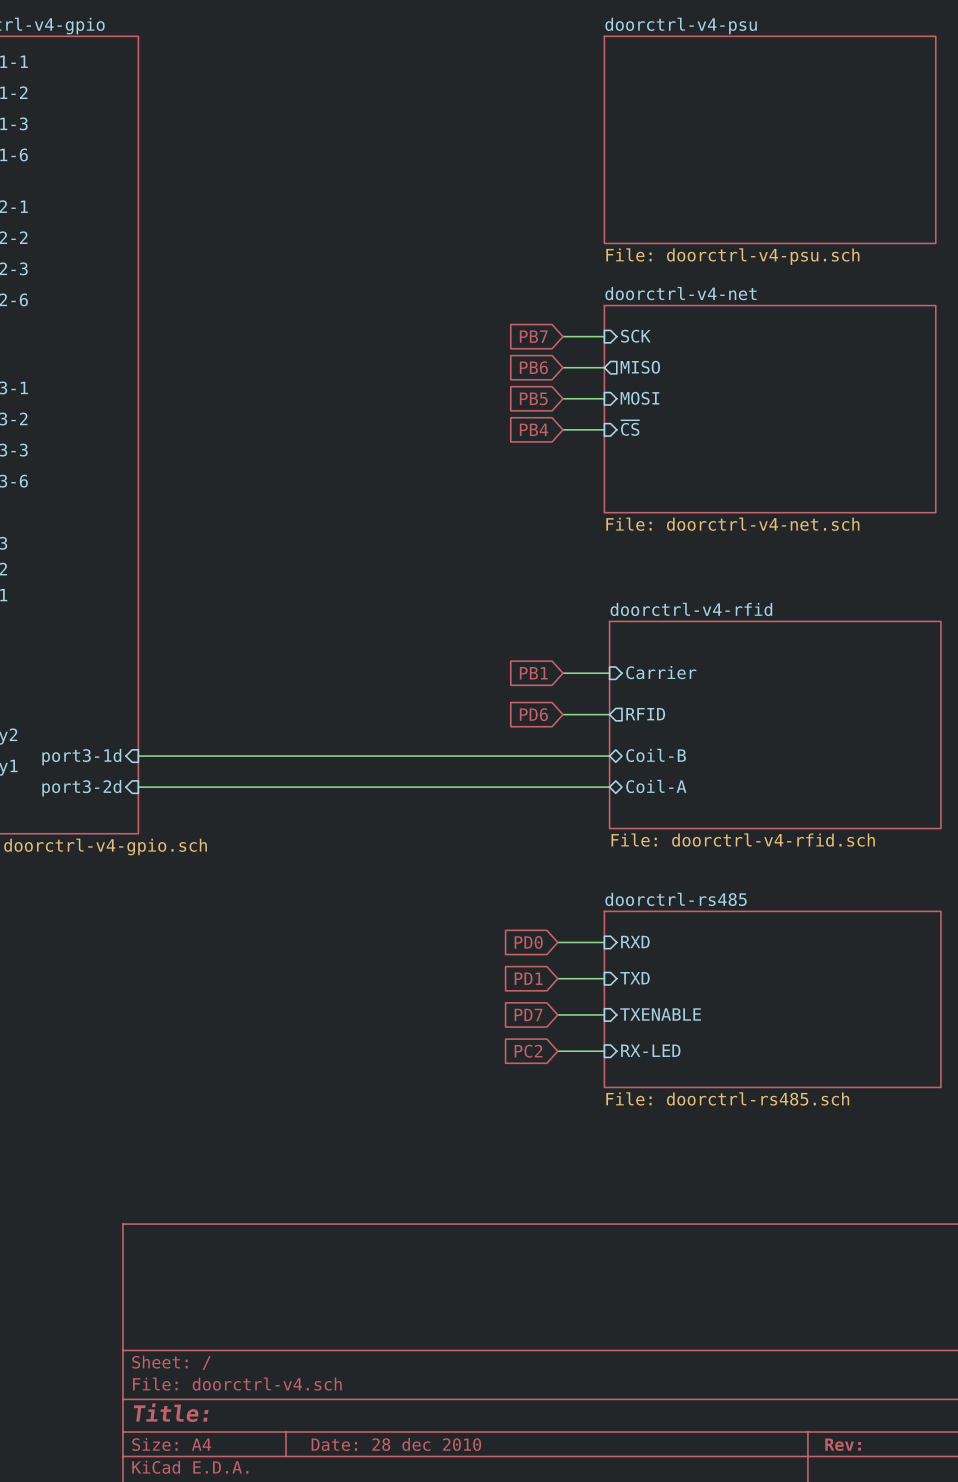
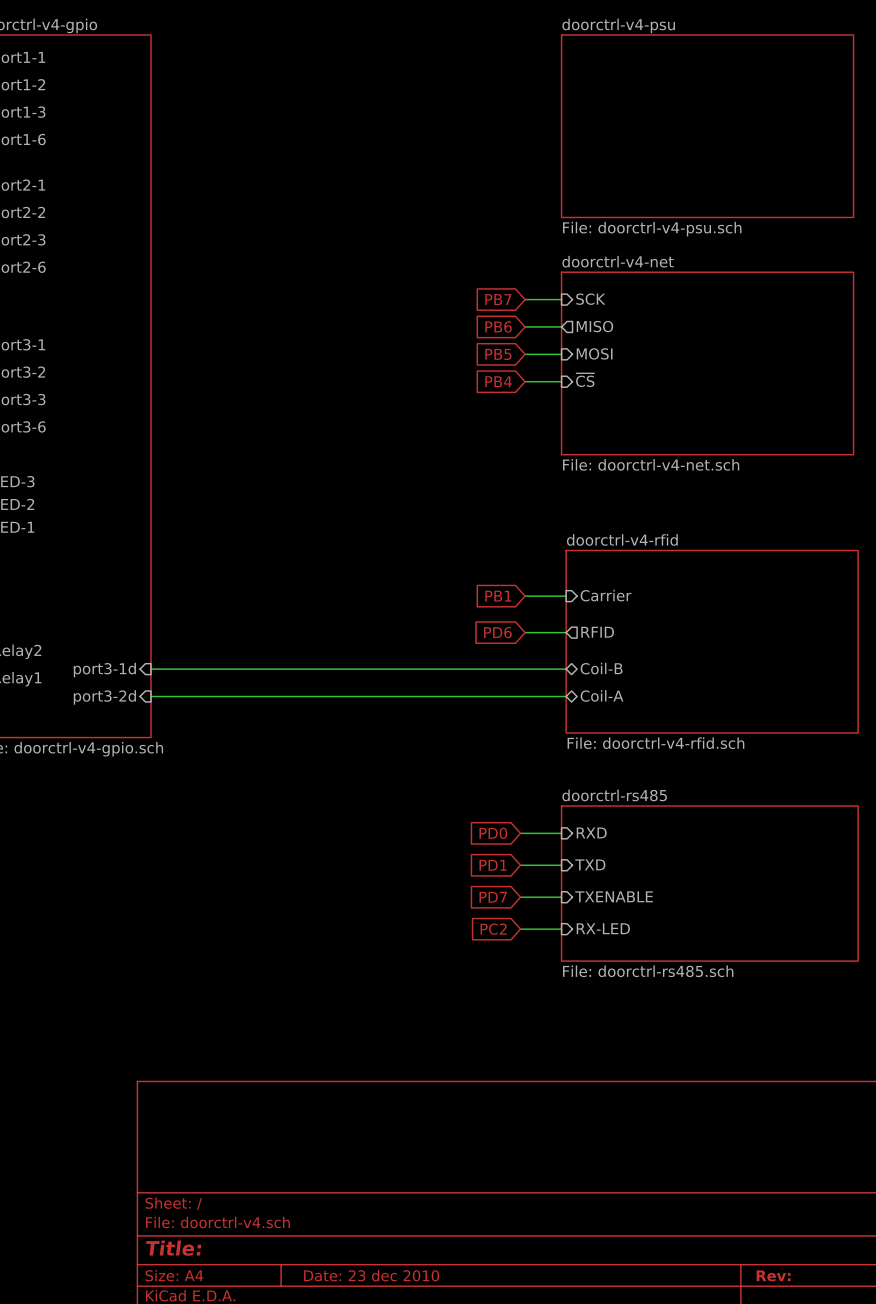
title block: Date: 28 dec 2010 (396, 1444) -> Date: 23 dec 2010 (371, 1275)

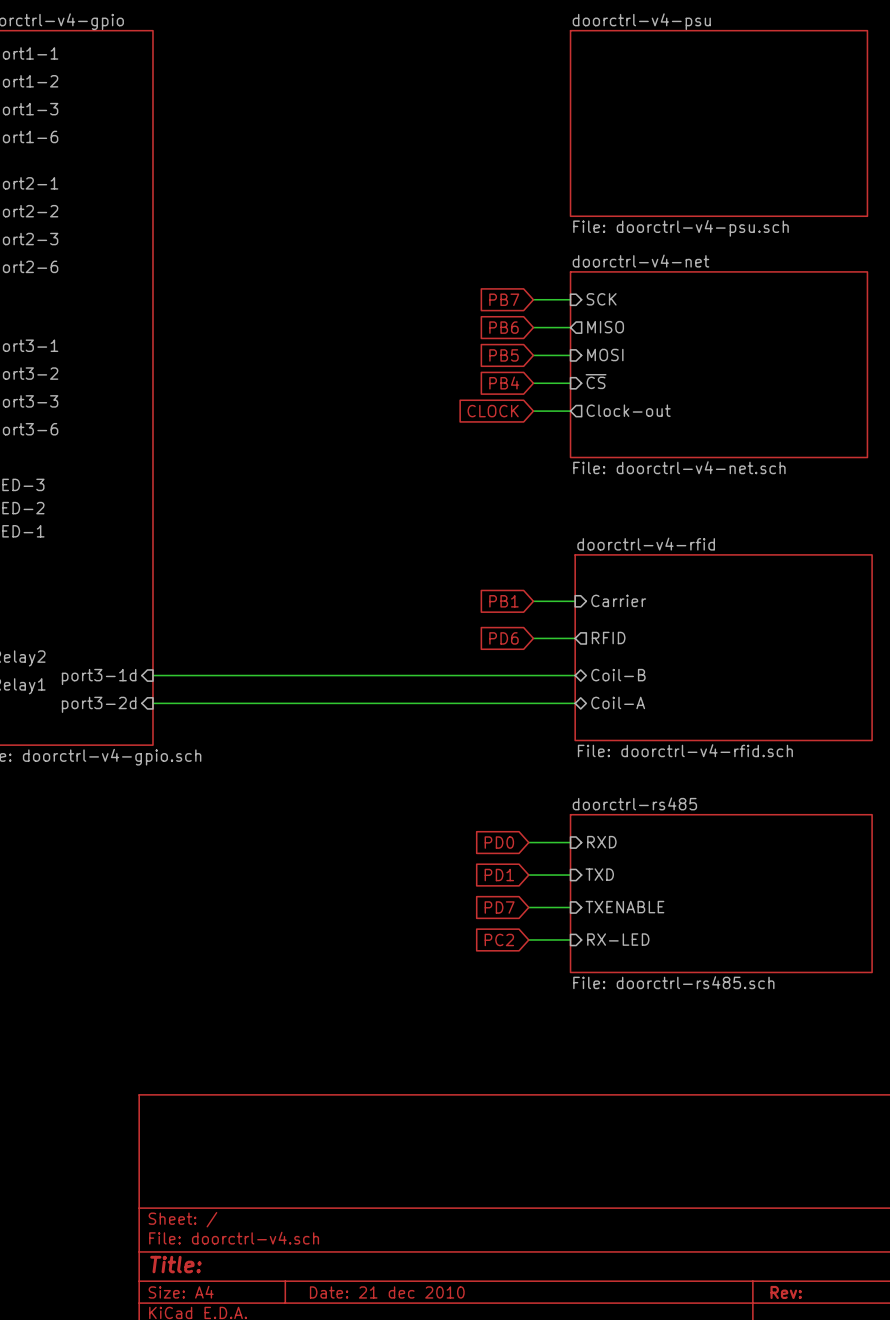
sheet pin: none -> Clock-out (628, 410)
global label: none -> CLOCK (493, 411)
wire: none -> (533, 411) (570, 411)
title block: Date: 23 dec 2010 (371, 1275) -> Date: 21 dec 2010 (387, 1292)

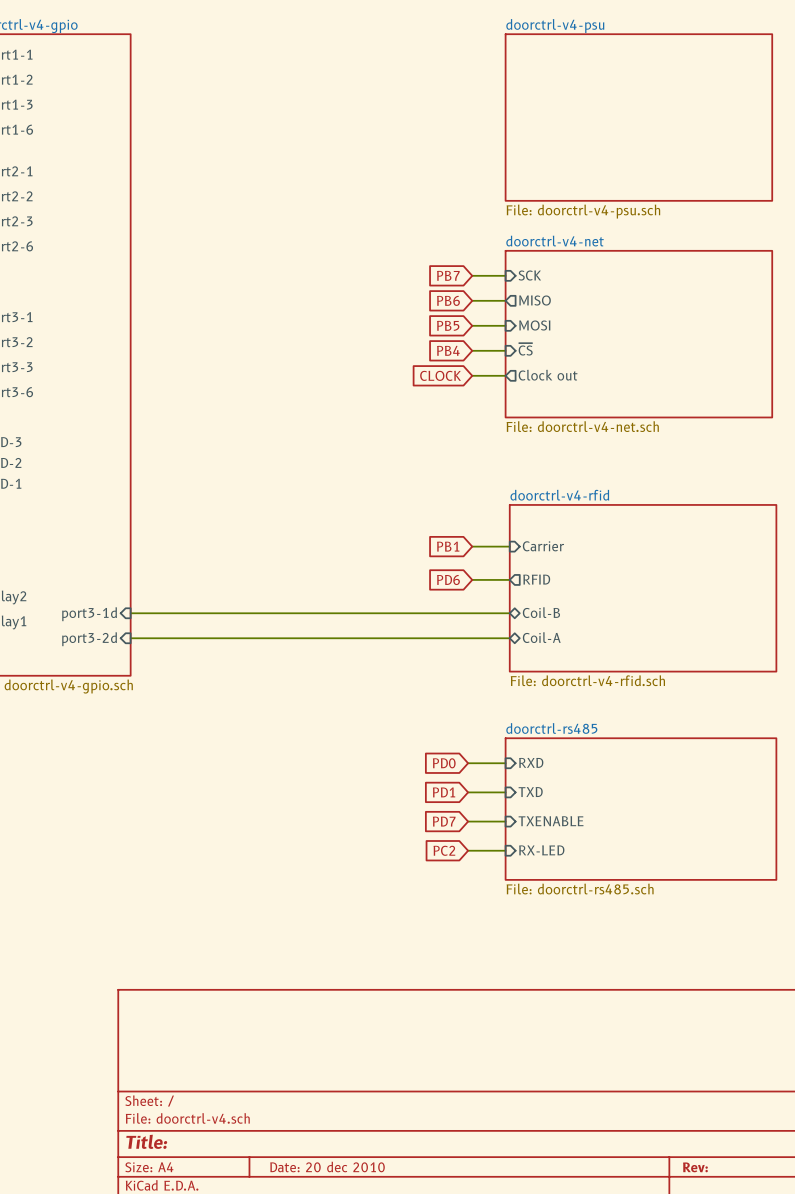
sheet pin: Clock-out (628, 410) -> Clock out (548, 375)
title block: Date: 21 dec 2010 (387, 1292) -> Date: 20 dec 2010 (327, 1166)

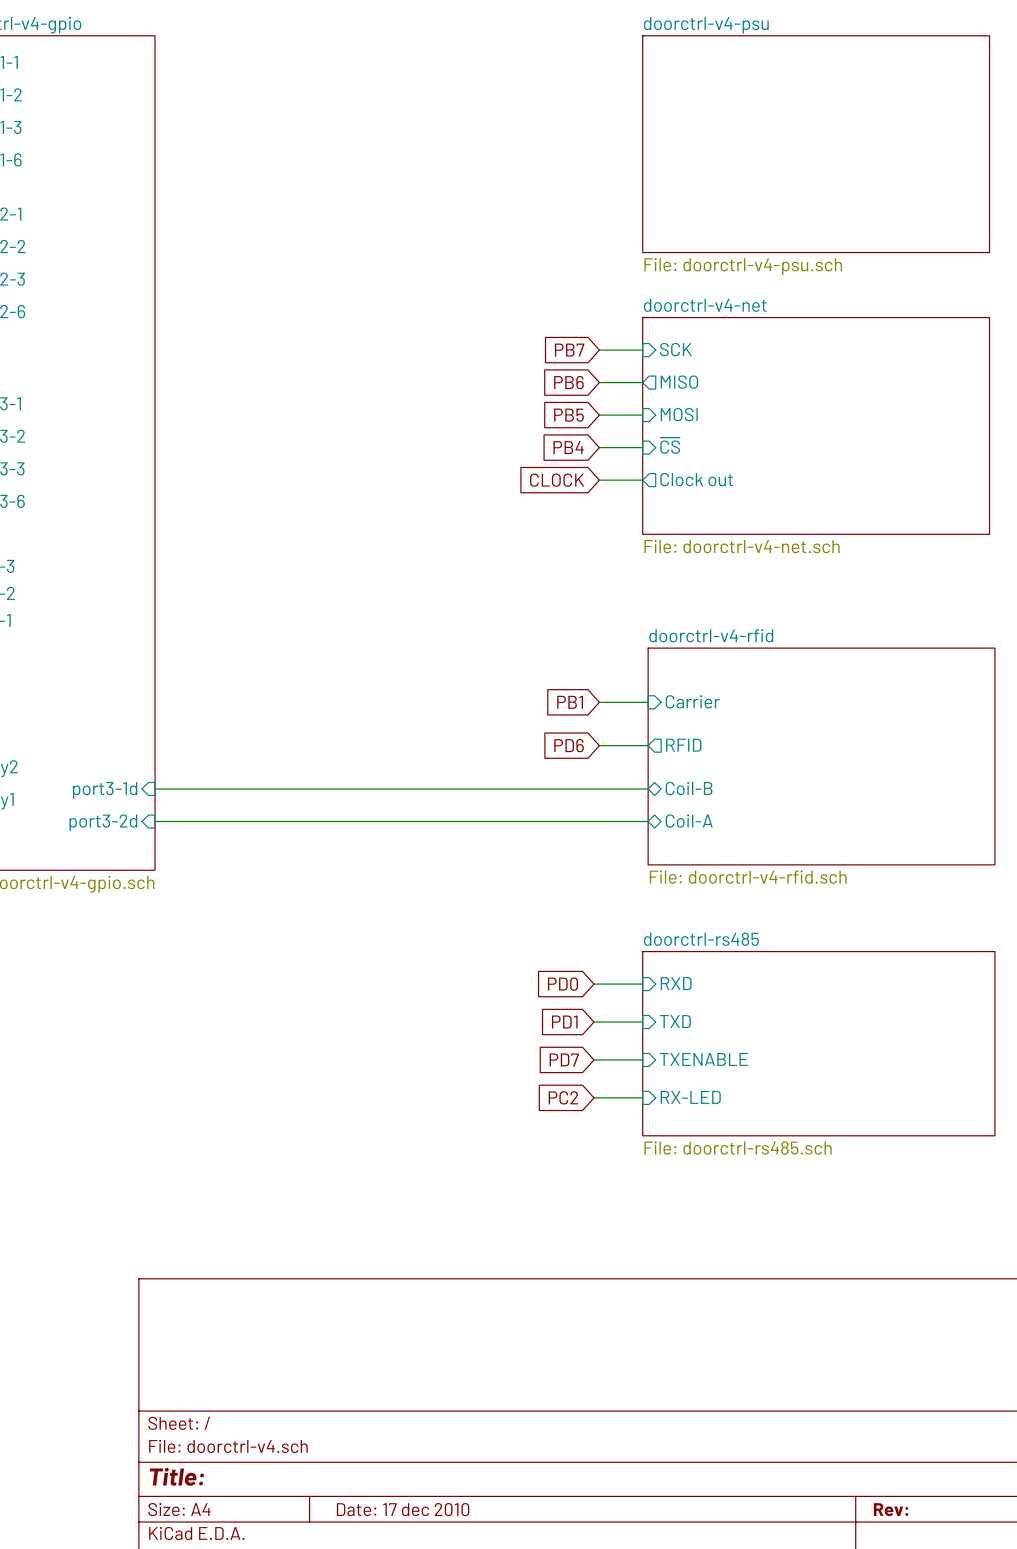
title block: Date: 20 dec 2010 (327, 1166) -> Date: 17 dec 2010 (403, 1509)

